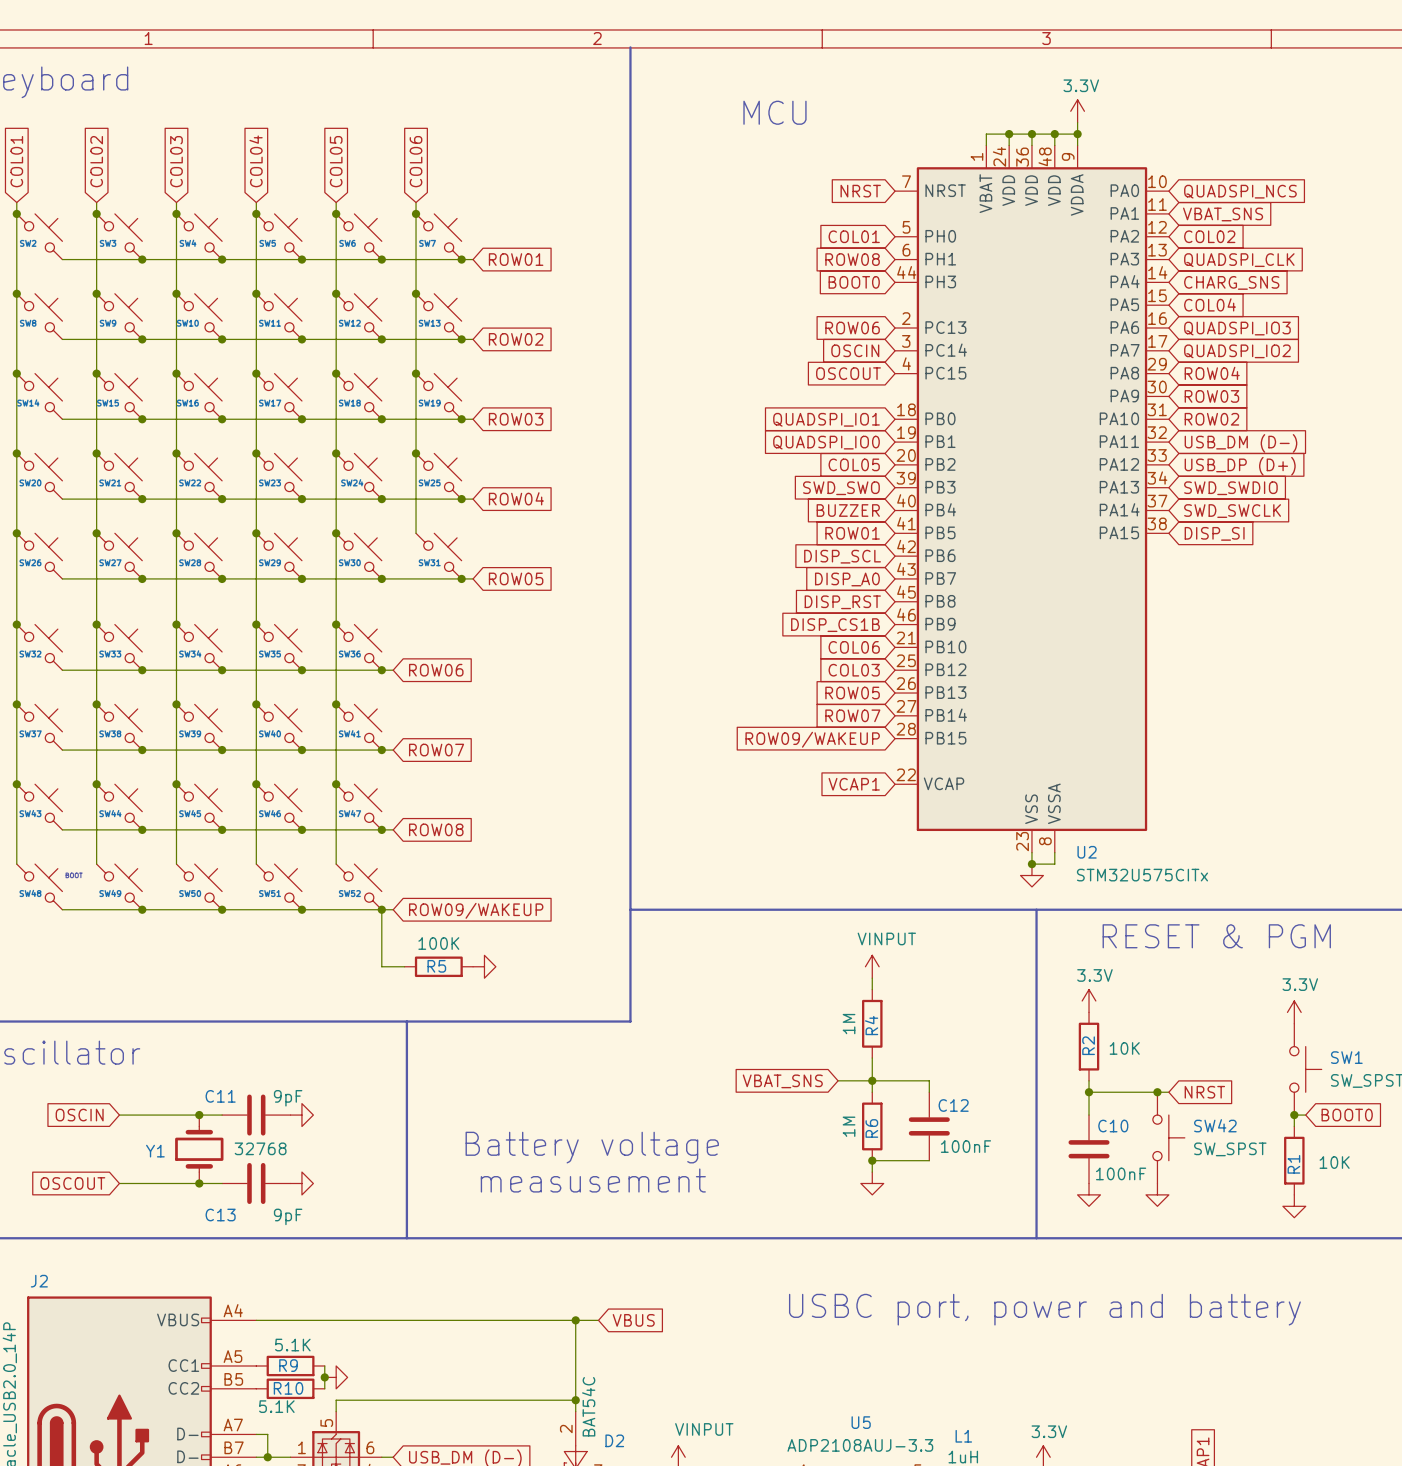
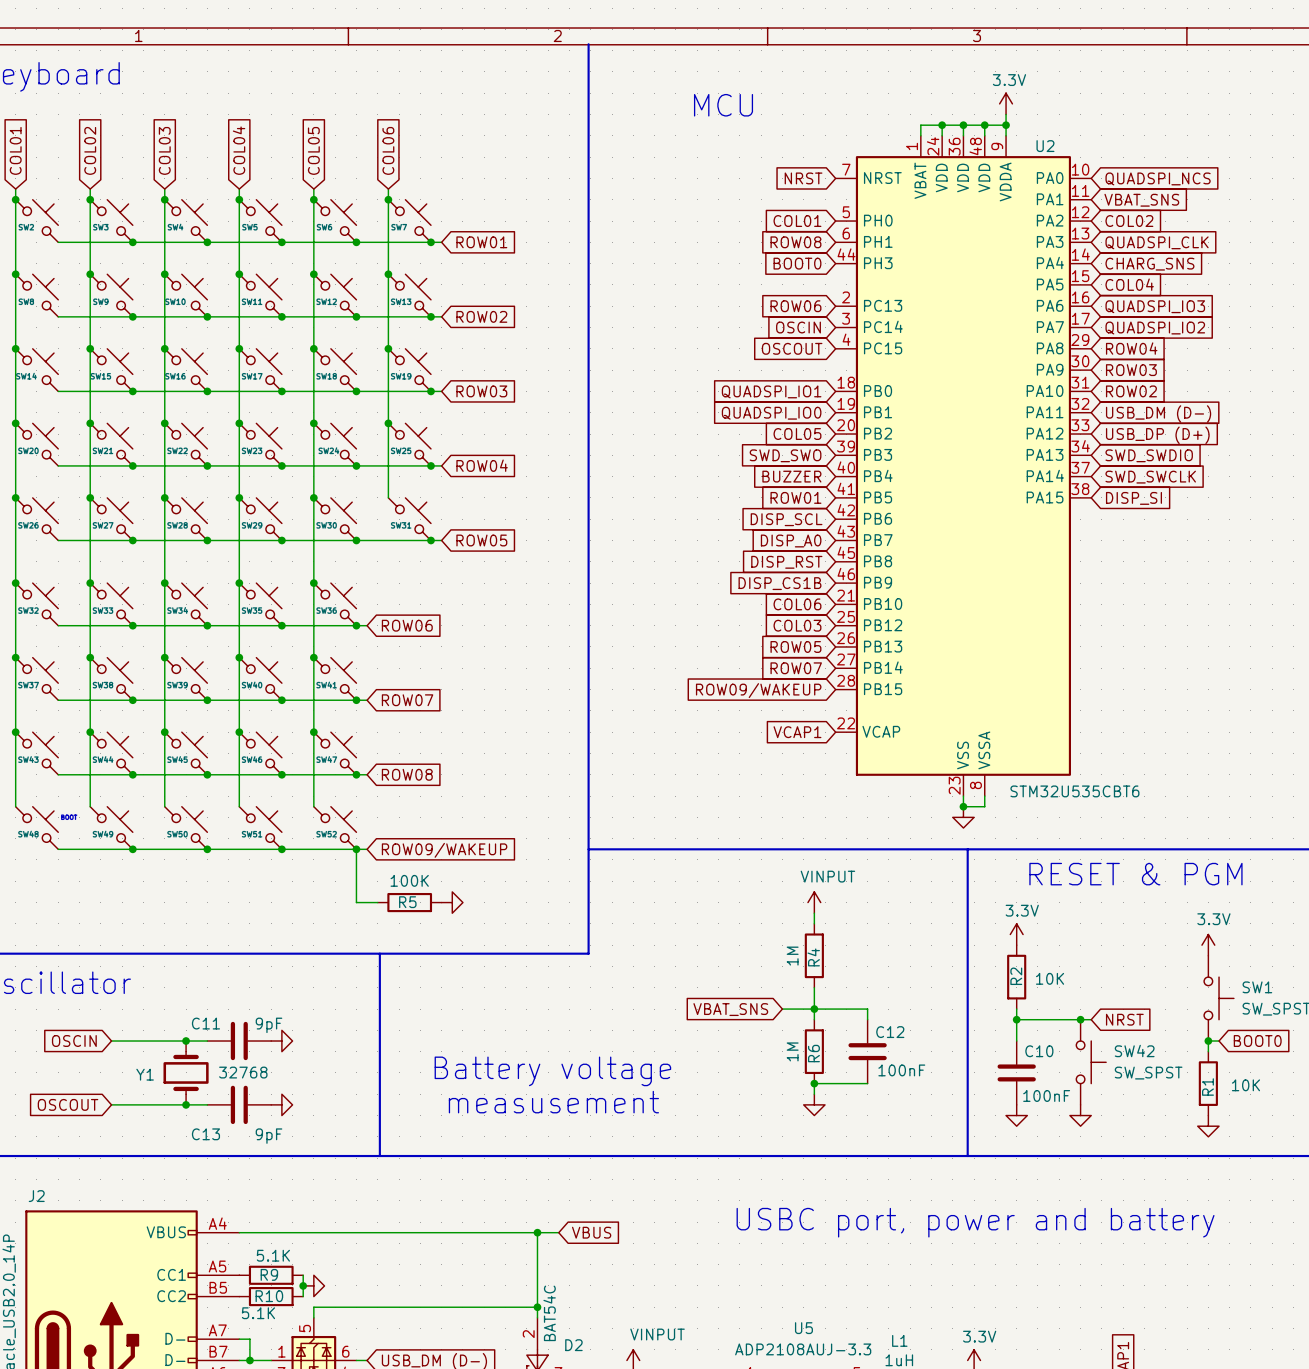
U2 name position: U2 (1087, 852) -> U2 (1045, 146)
U2 value: STM32U575CITx (1142, 875) -> STM32U535CBT6 (1074, 791)

